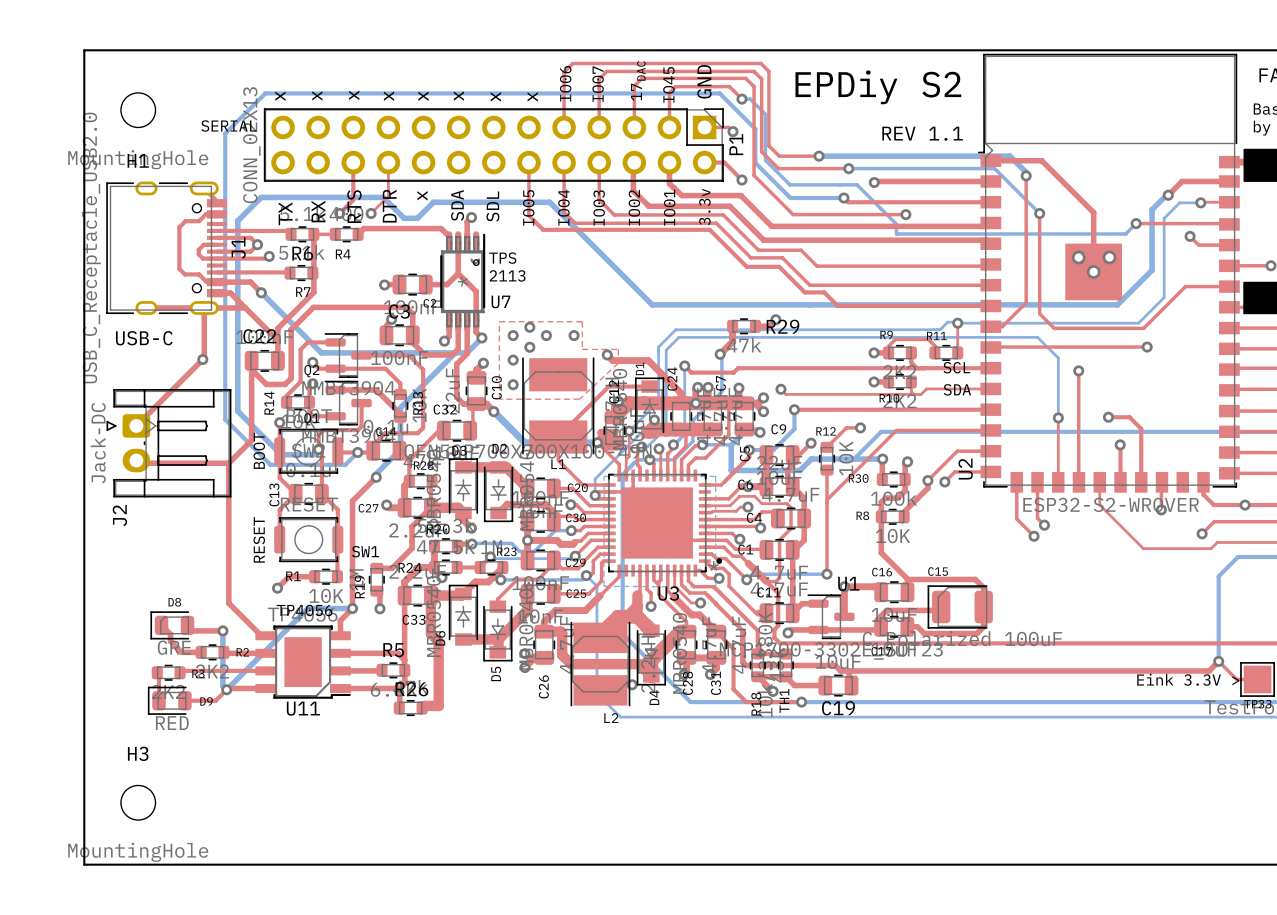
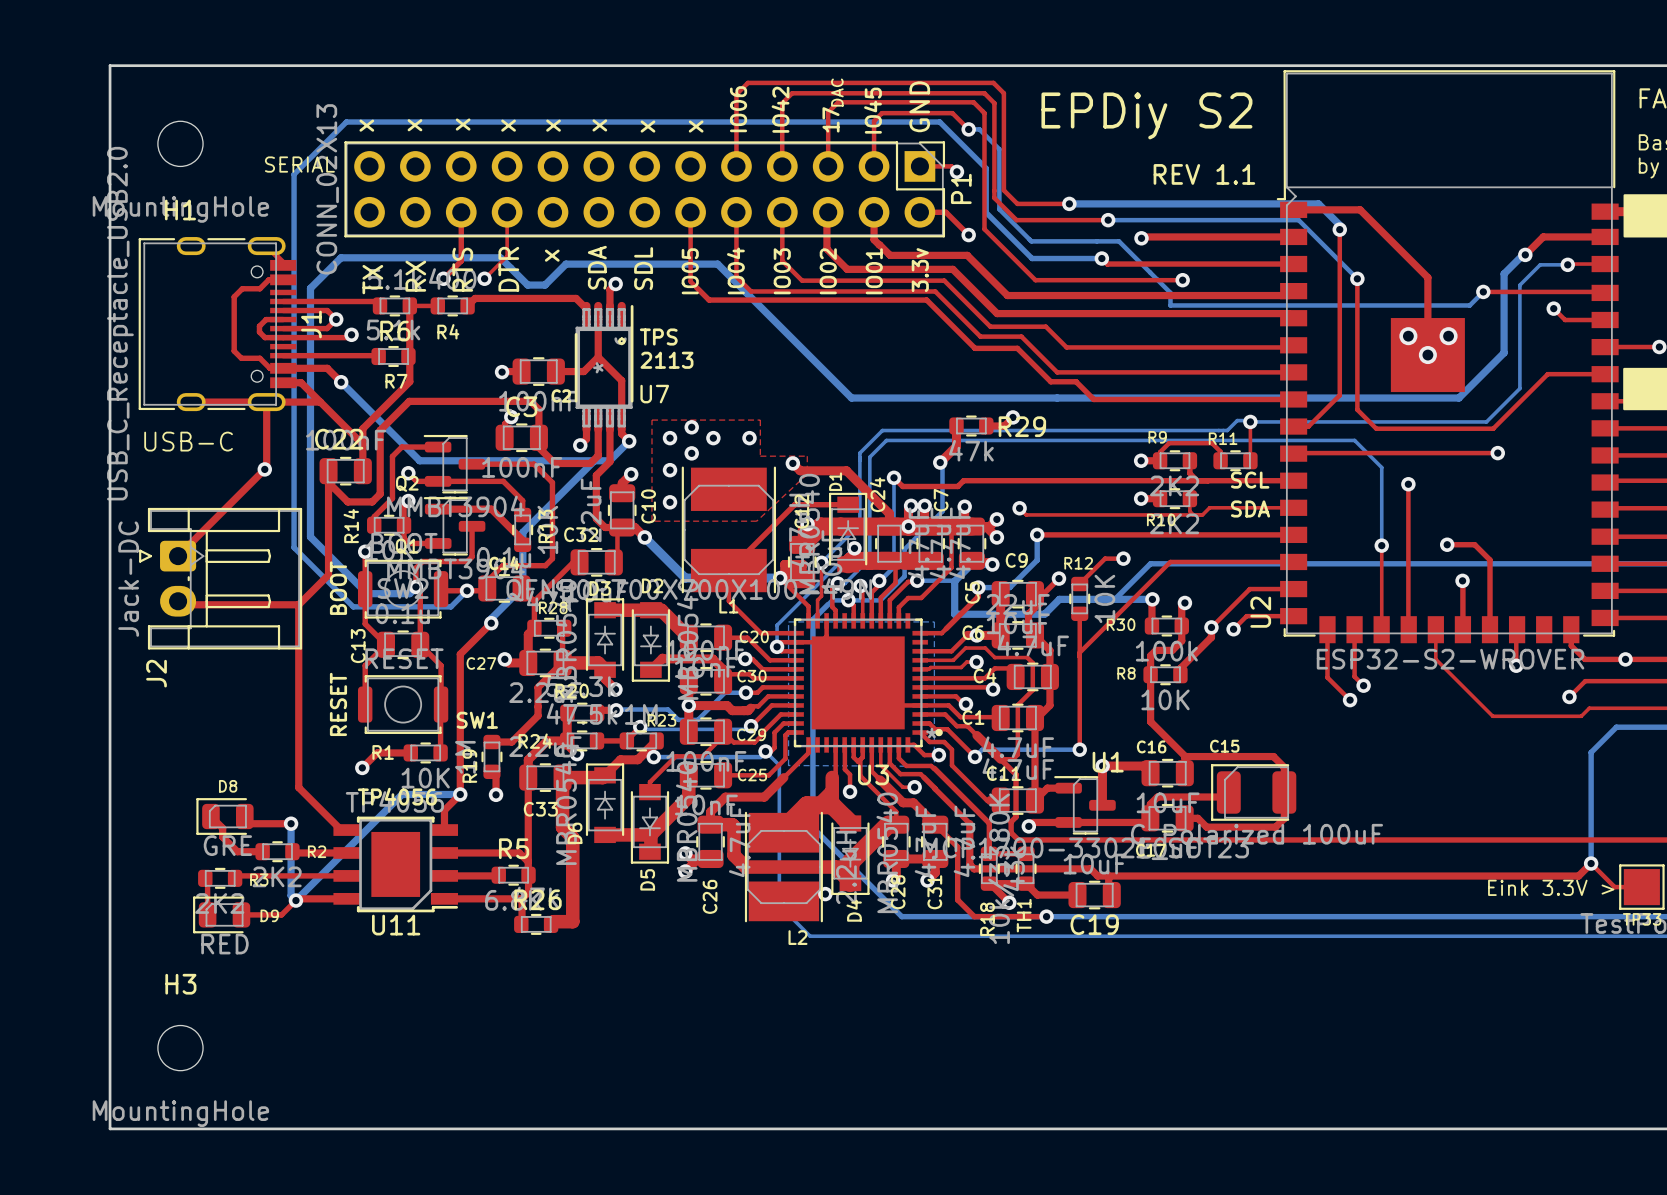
text: IO07 (598, 84) -> IO42 (780, 109)

